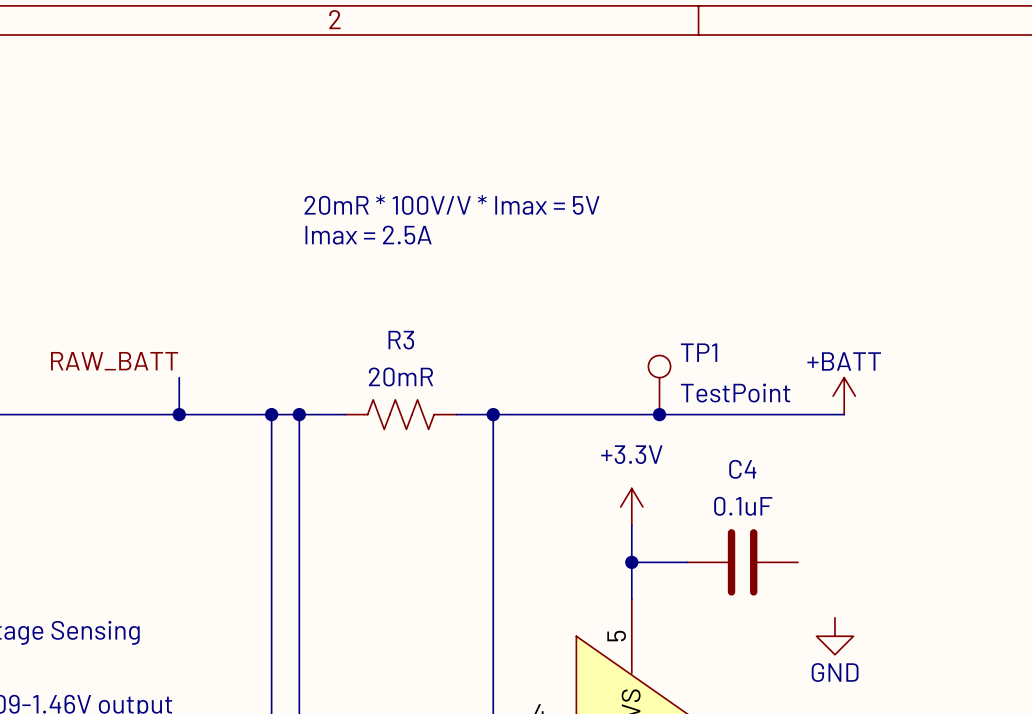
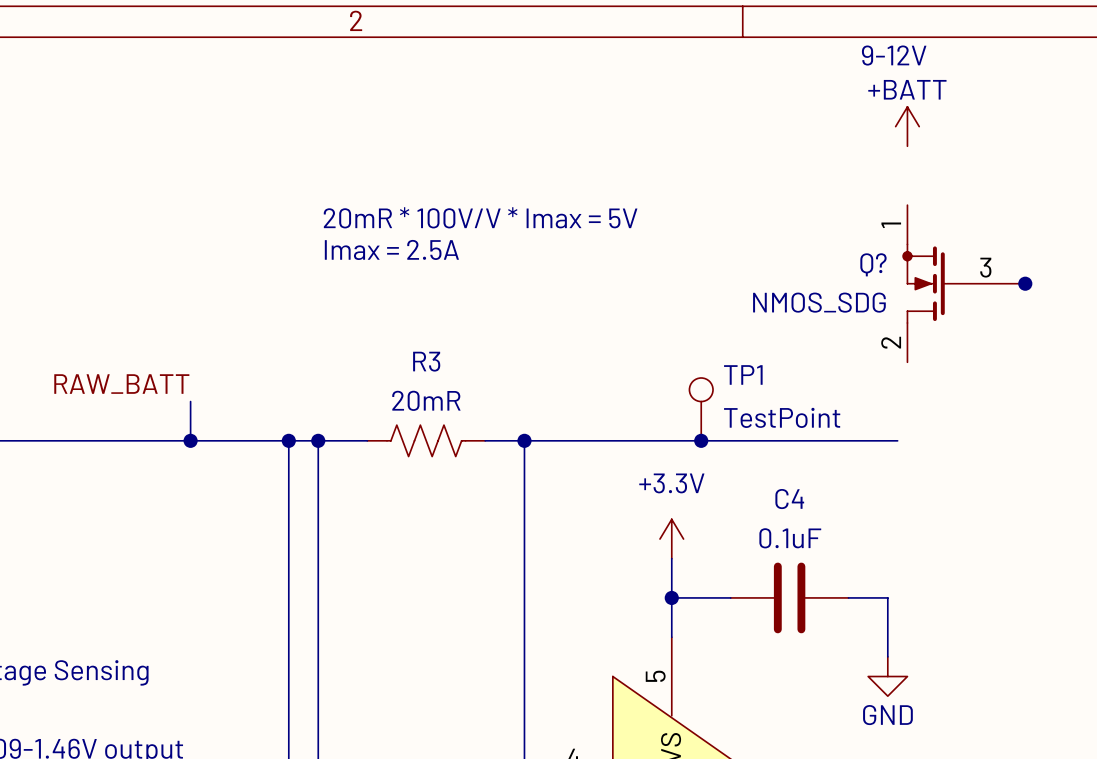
text: none -> 9-12V (894, 55)
Q?: none -> NMOS_SDG (964, 283)
junction: none -> (1025, 283)
power symbol position: +BATT (844, 396) -> +BATT (907, 126)
wire: none -> (848, 597) (887, 597) (887, 656)

